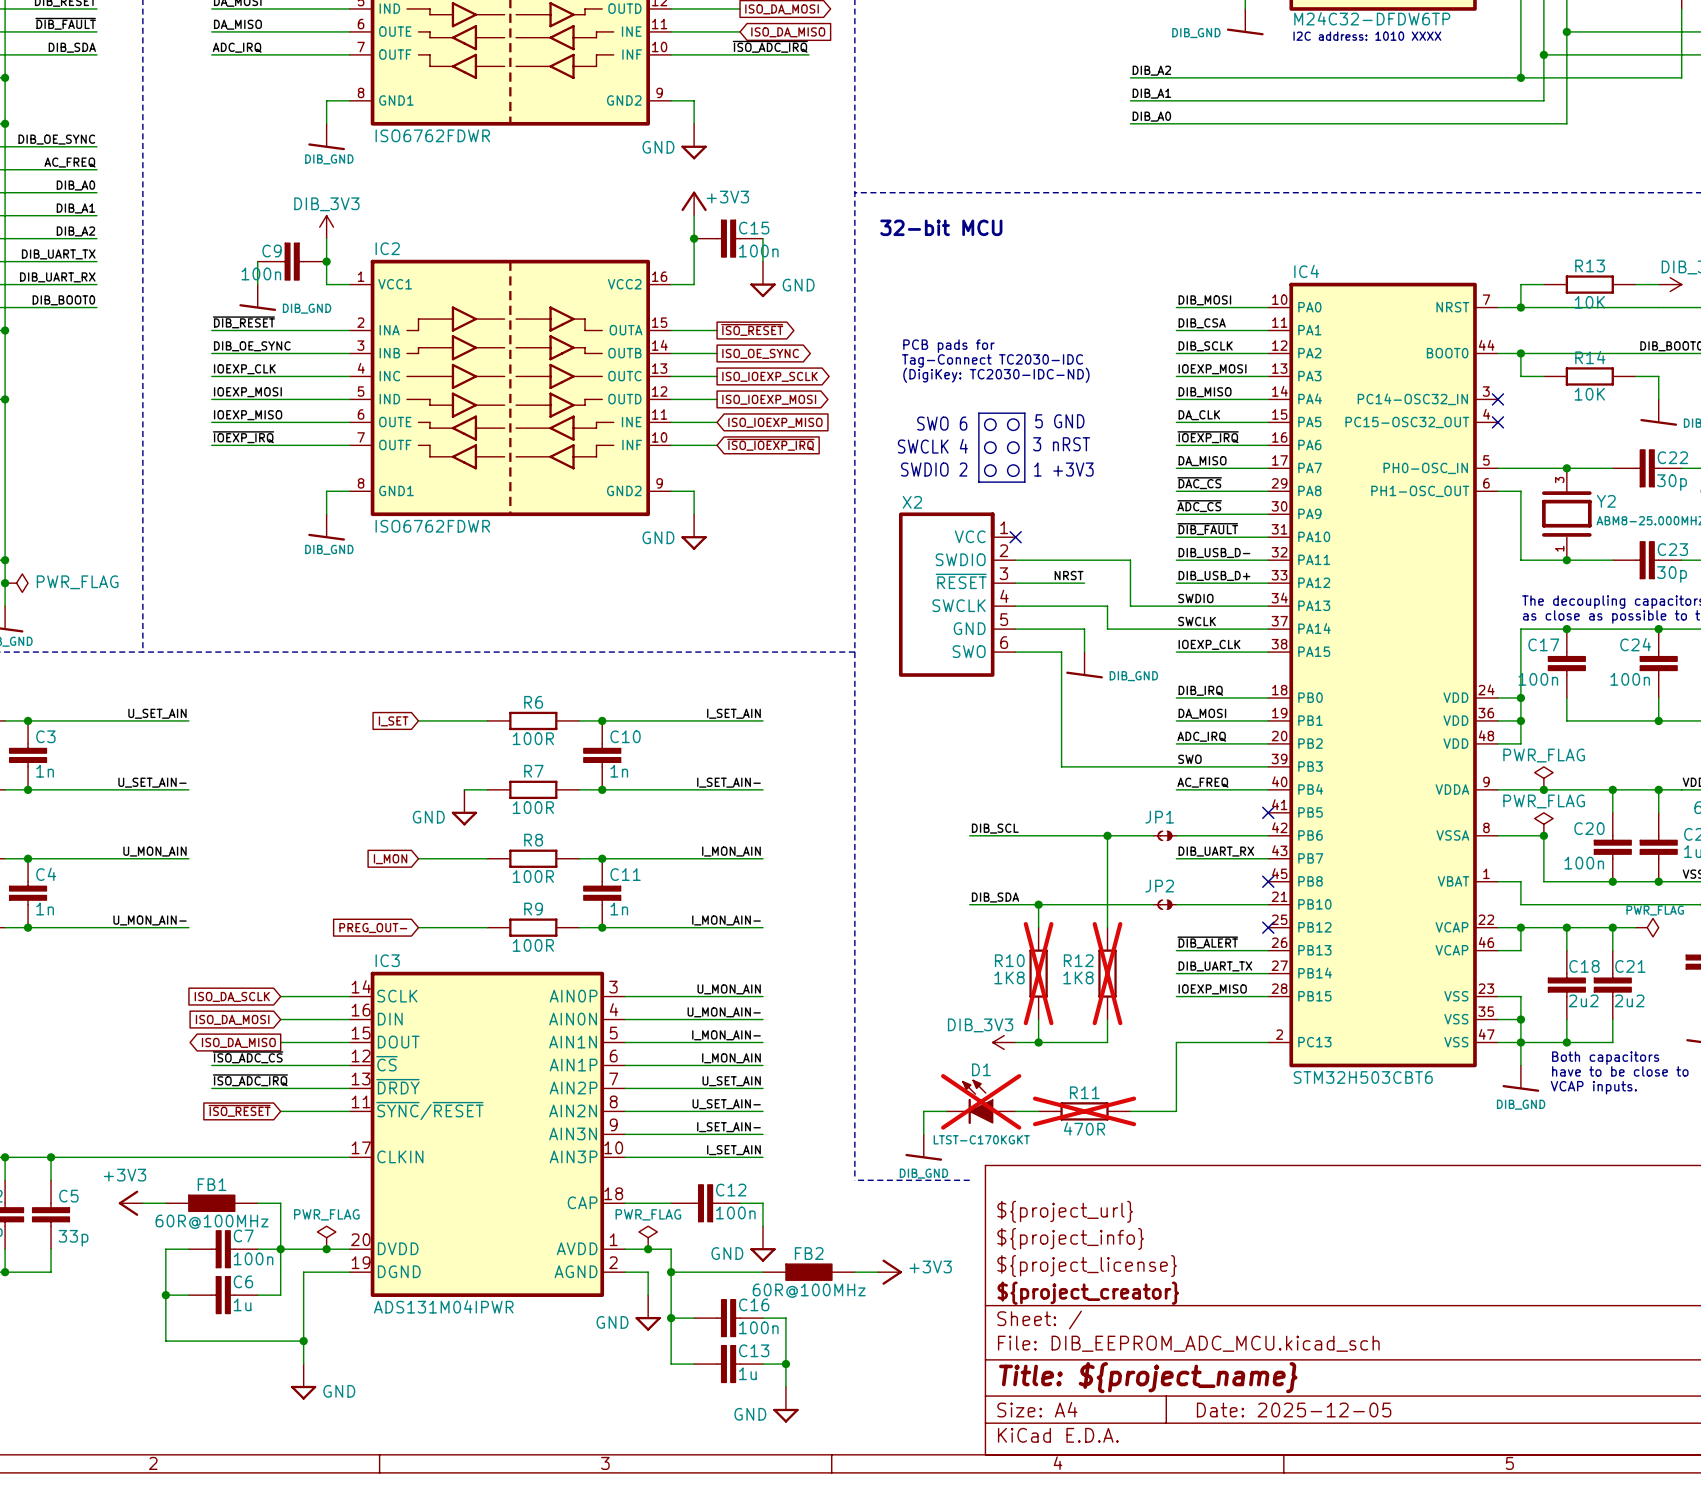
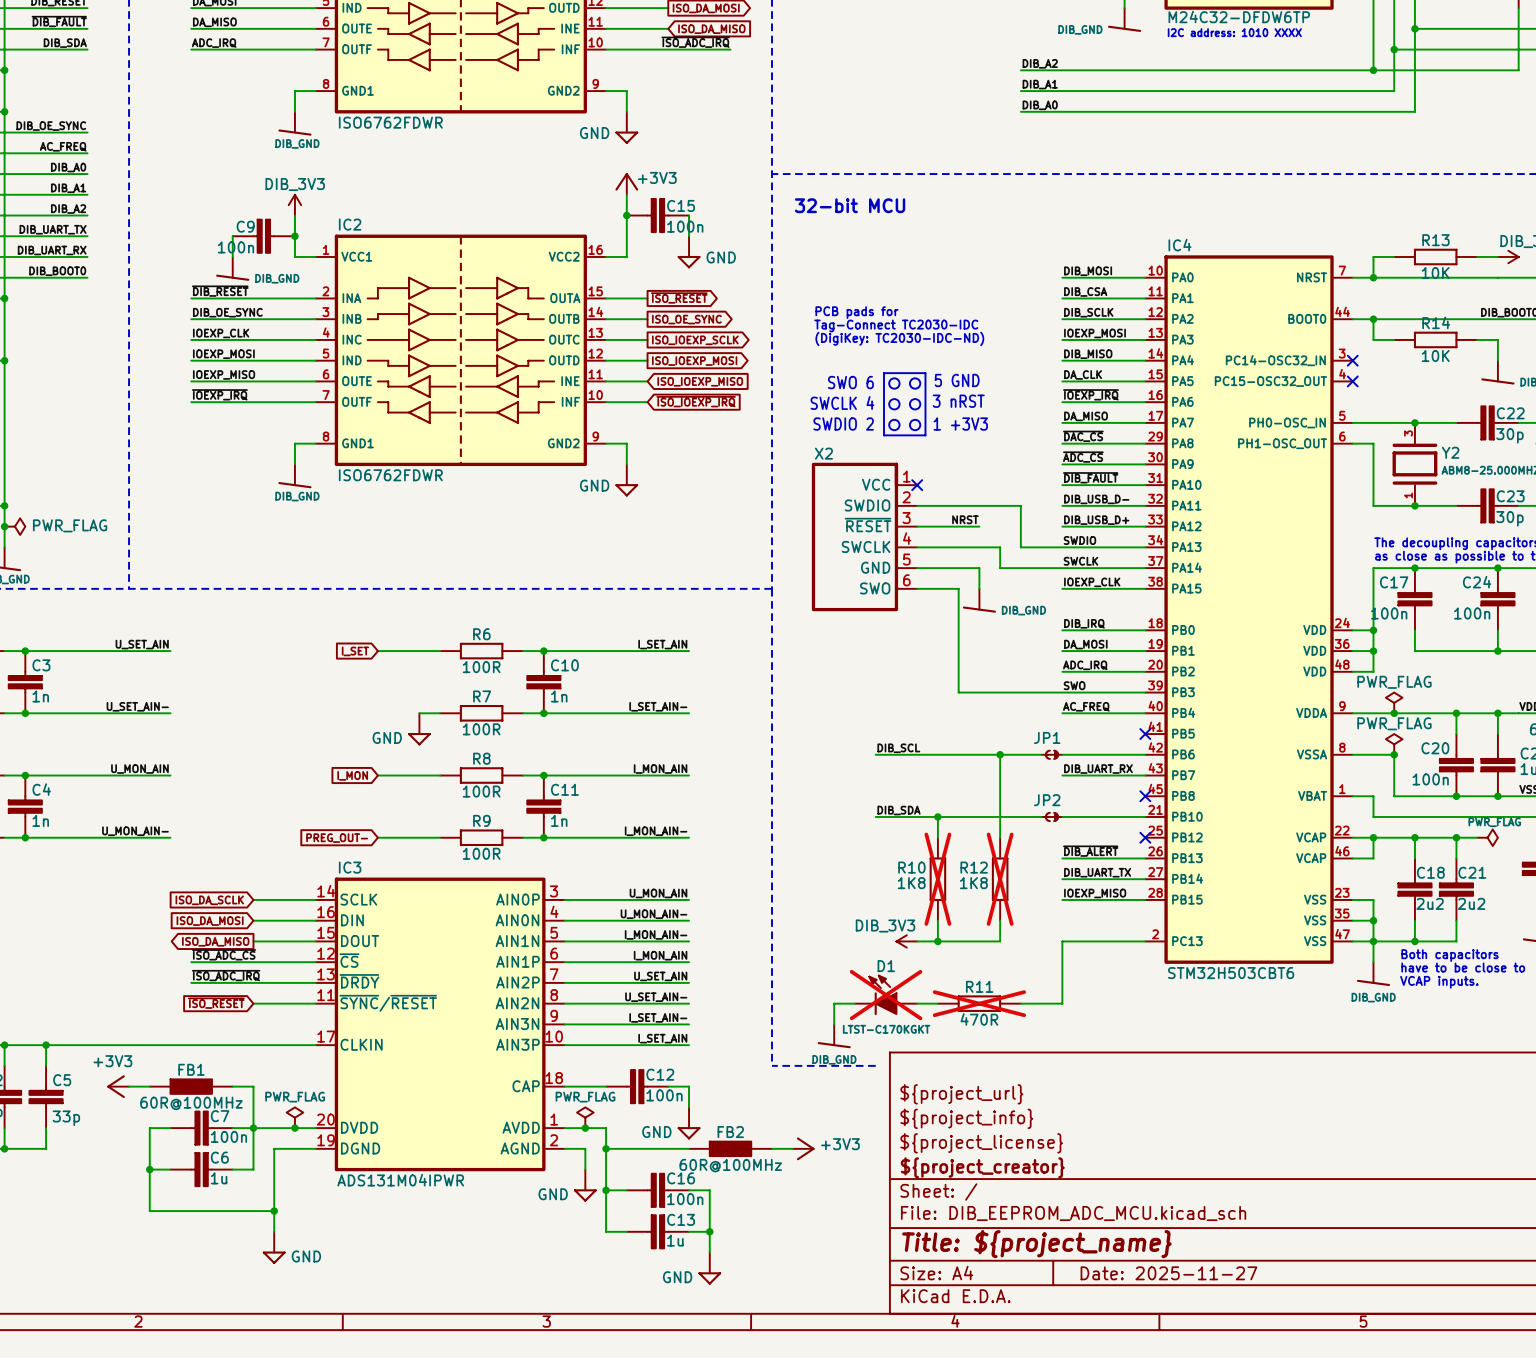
title block: Date: 2025-12-05 (1294, 1410) -> Date: 2025-11-27 (1168, 1273)

